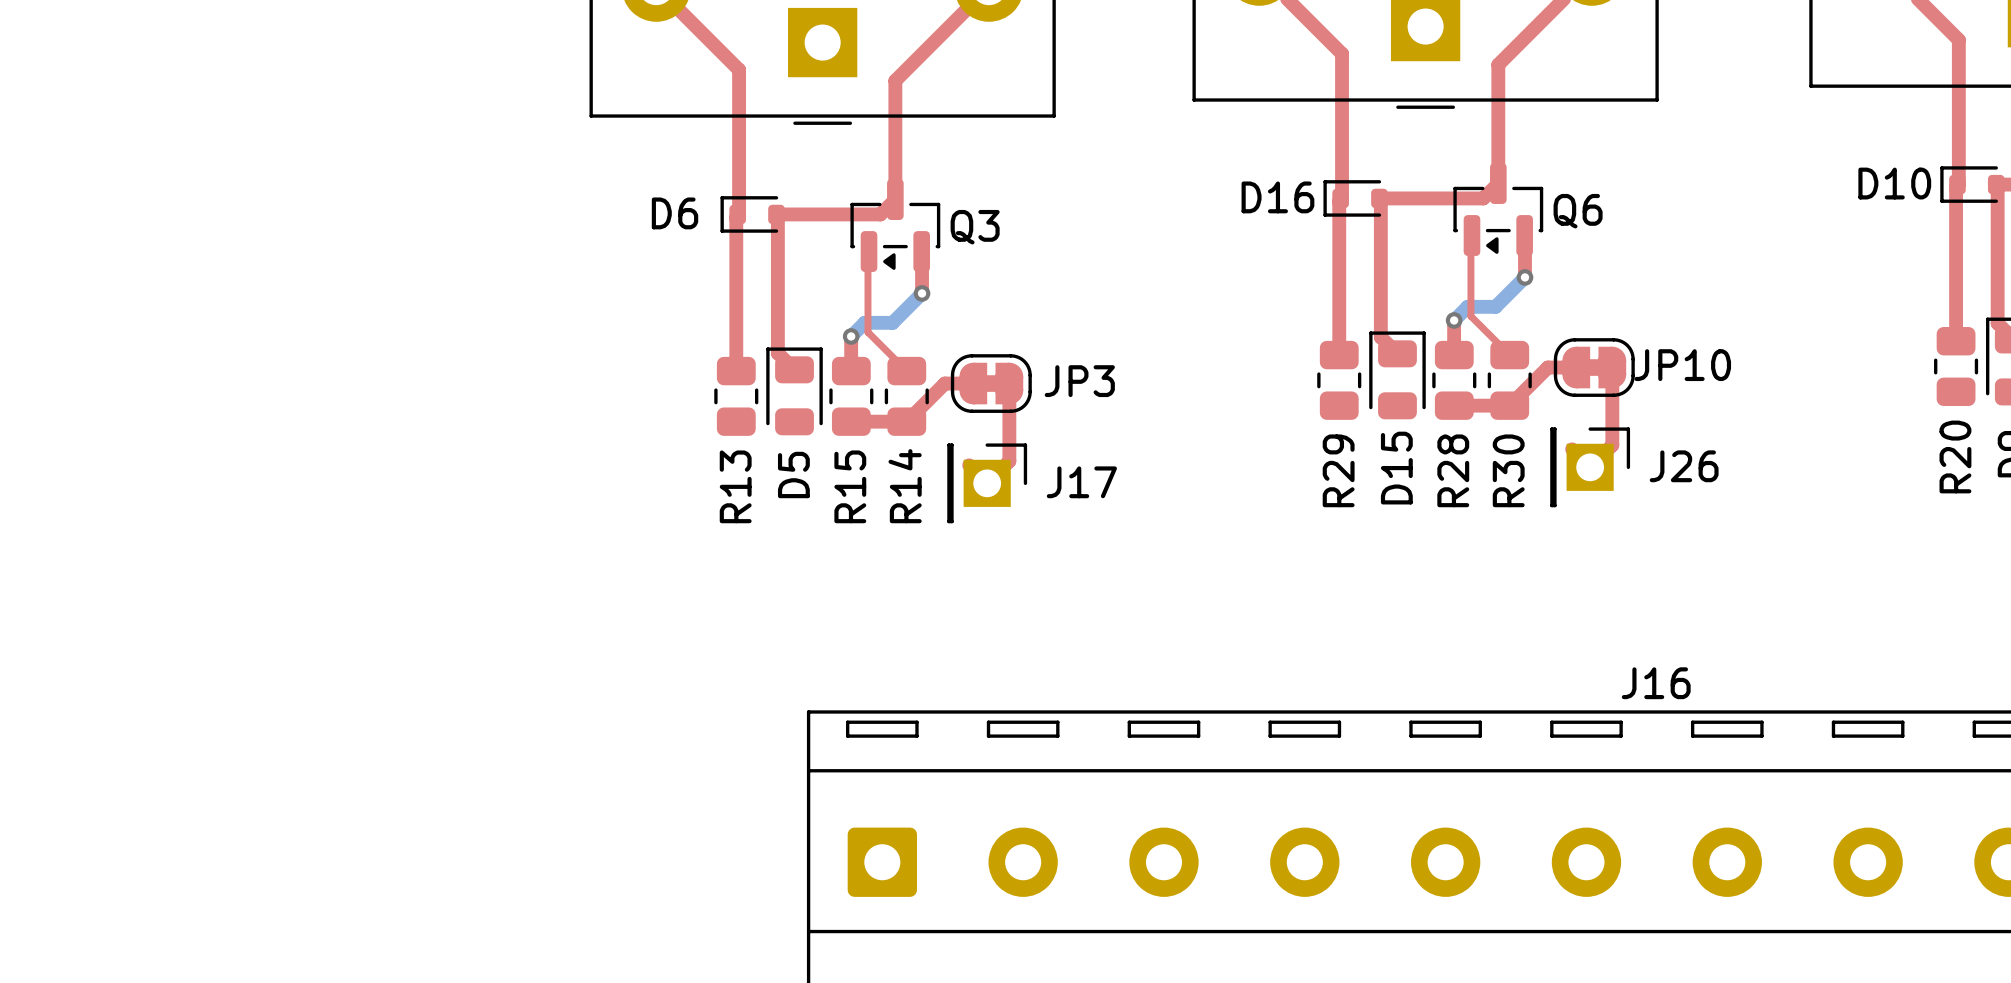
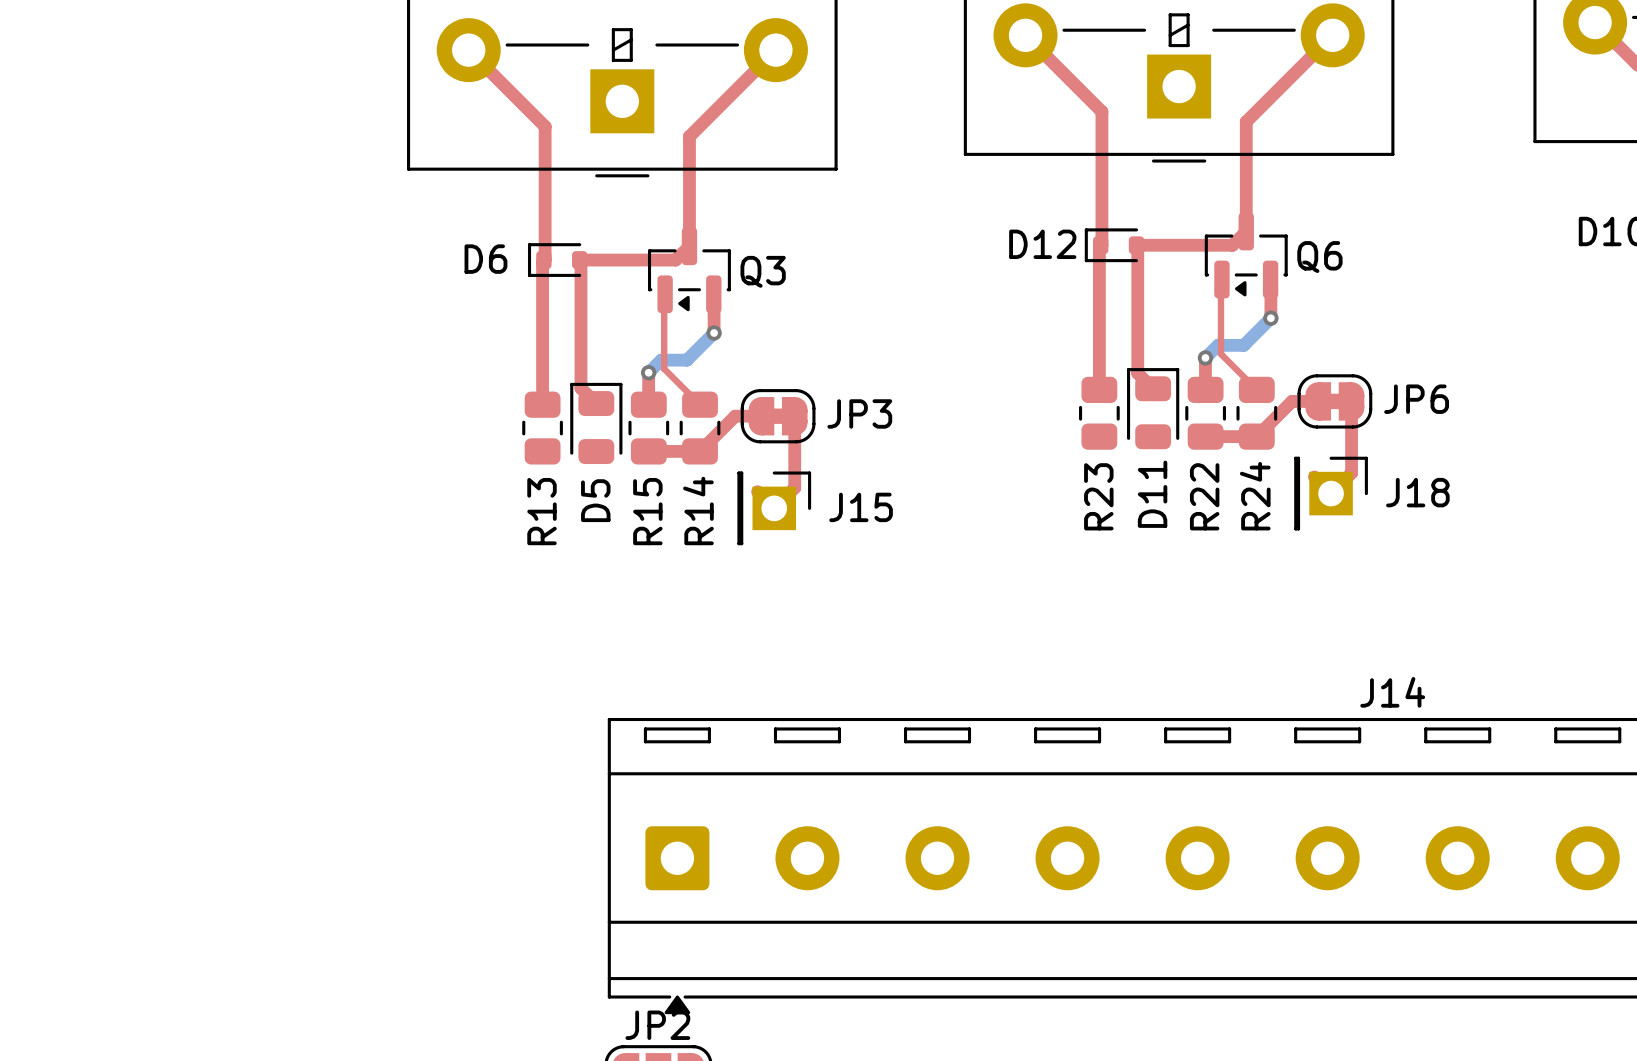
D16 name: D16 (1277, 197) -> D12 (1042, 244)
JP10 name: JP10 (1682, 365) -> JP6 (1416, 399)
J26 name: J26 (1684, 466) -> J18 (1417, 492)
D15 name: D15 (1396, 468) -> D11 (1152, 494)
R29 name: R29 (1338, 470) -> R23 (1098, 496)
R28 name: R28 (1453, 470) -> R22 (1204, 496)
R30 name: R30 (1508, 470) -> R24 (1255, 496)
J17 name: J17 (1081, 482) -> J15 (861, 507)
J16 name: J16 (1656, 683) -> J14 (1392, 692)

